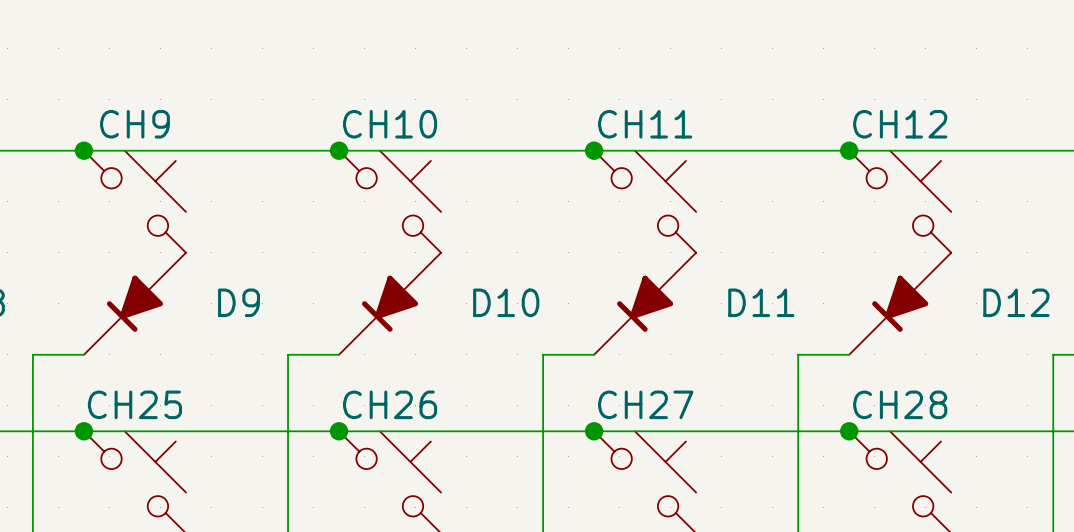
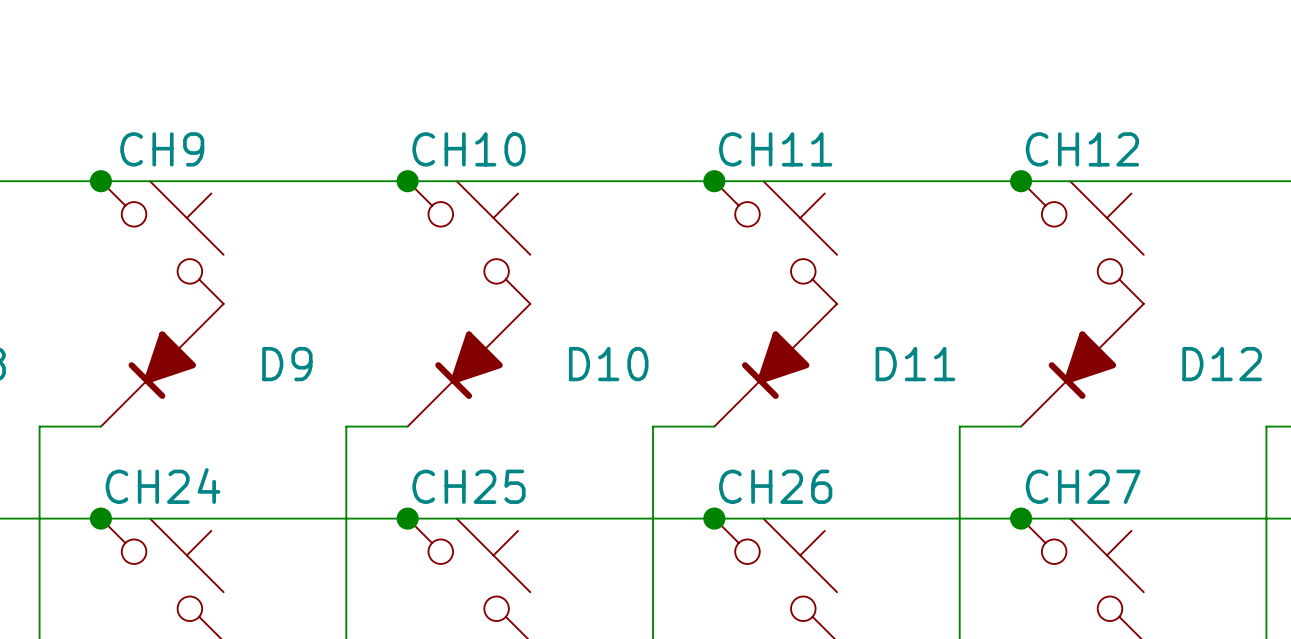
CH25 name: CH25 (134, 404) -> CH24 (163, 486)
CH26 name: CH26 (390, 404) -> CH25 (468, 486)
CH27 name: CH27 (645, 404) -> CH26 (775, 486)
CH28 name: CH28 (900, 404) -> CH27 (1083, 486)

